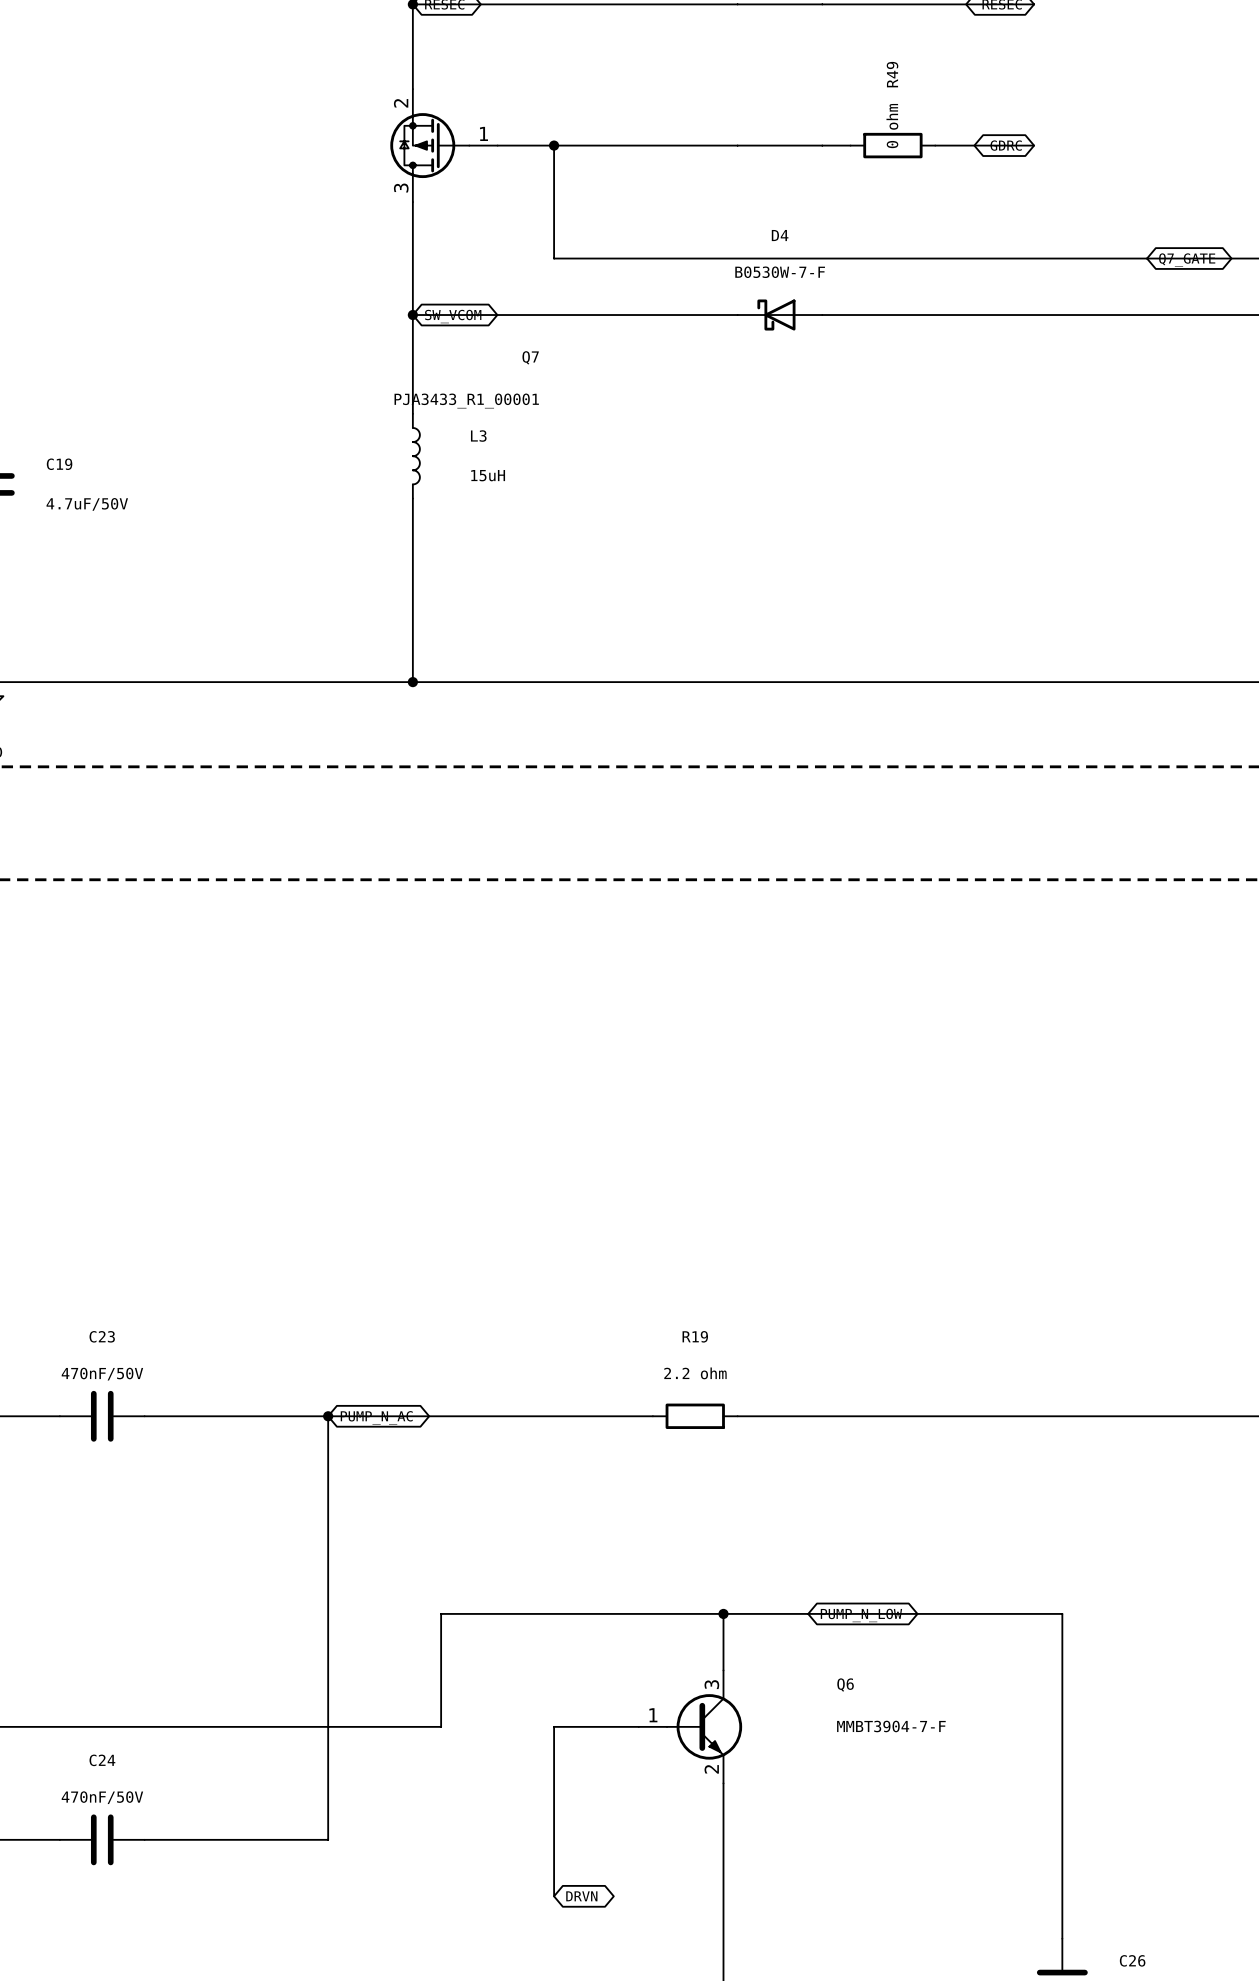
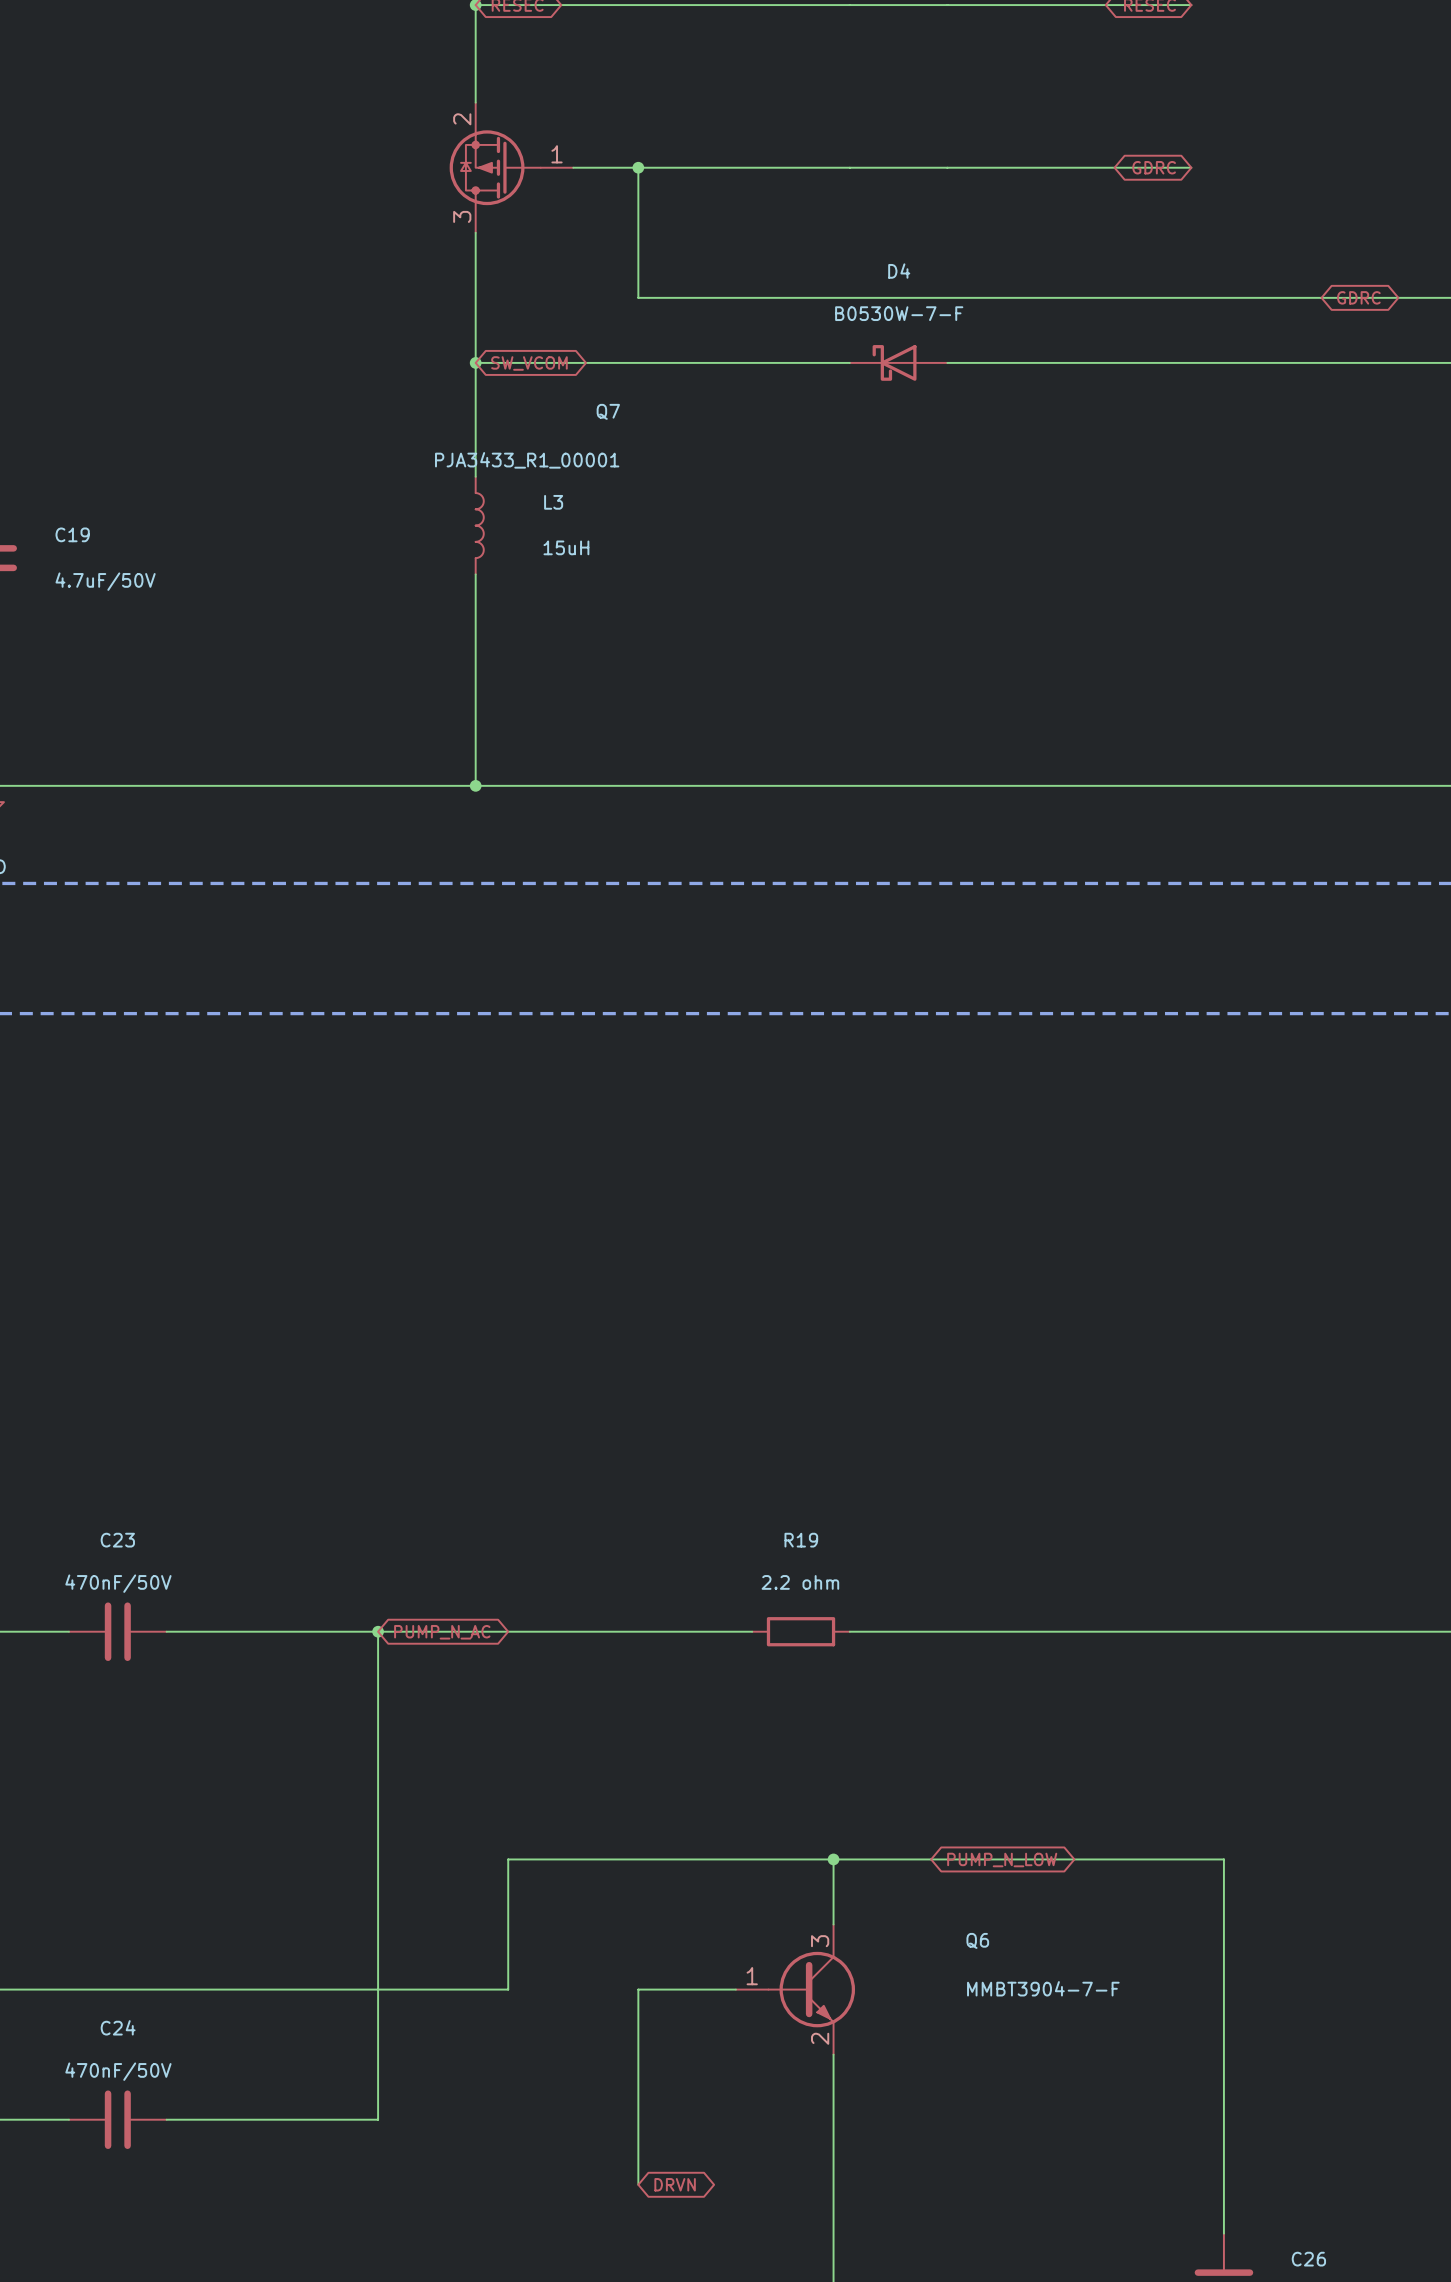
wire: none -> (979, 167) (1077, 167)
R49: 0 ohm (892, 145) -> none
global label: Q7_GATE (1187, 260) -> GDRC (1358, 297)

